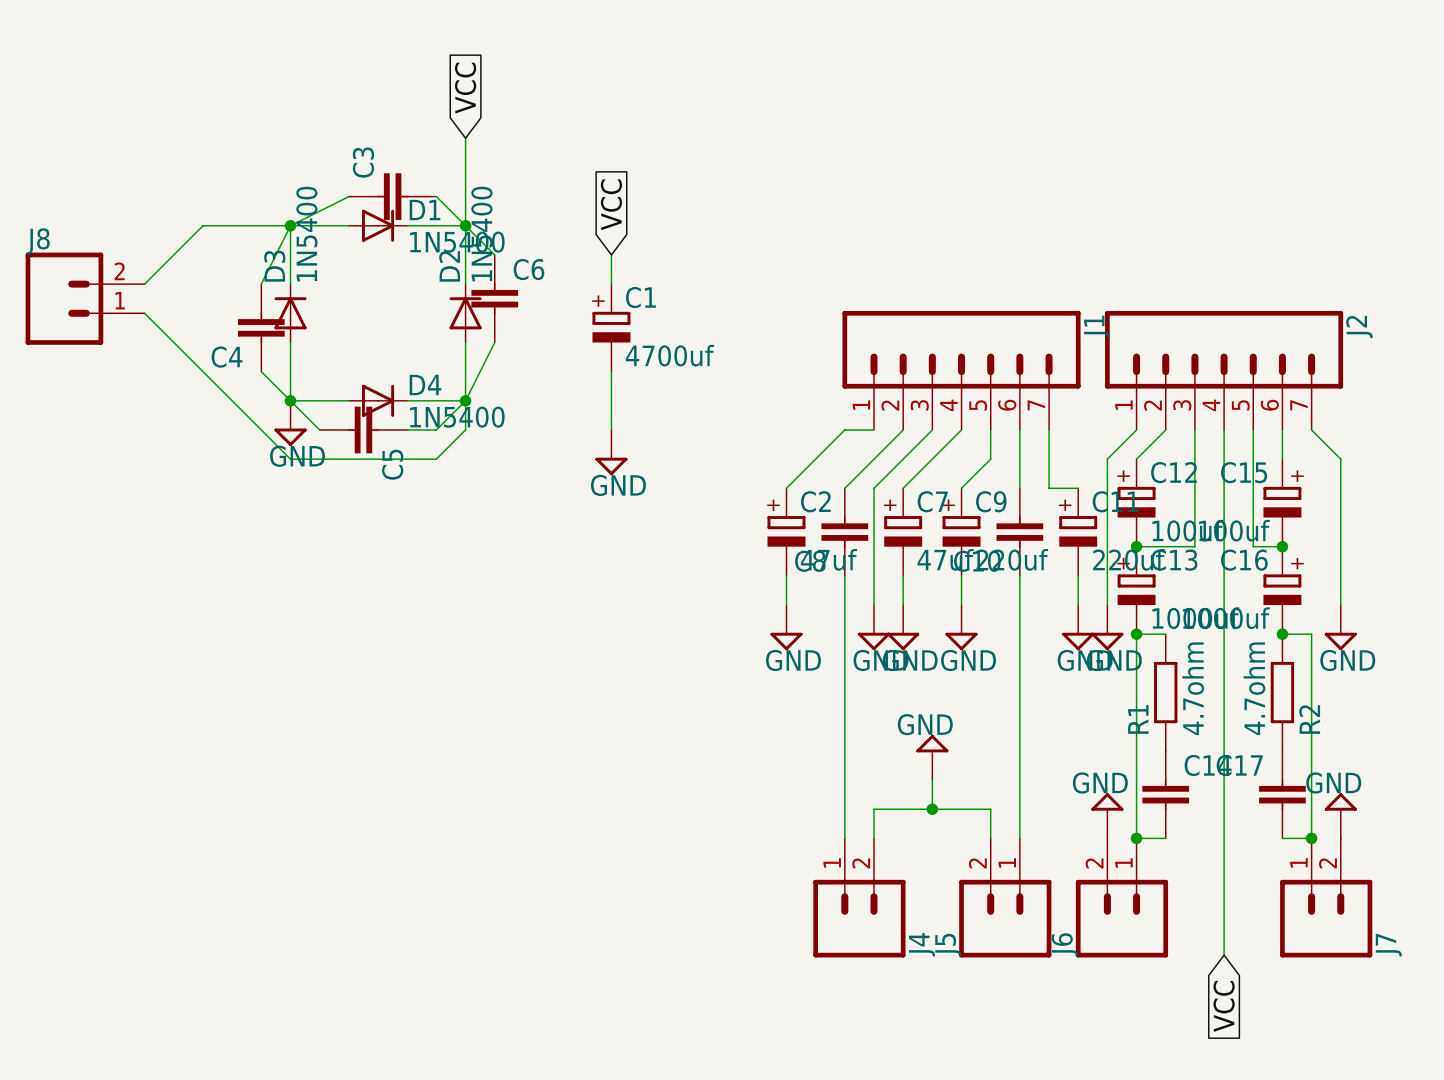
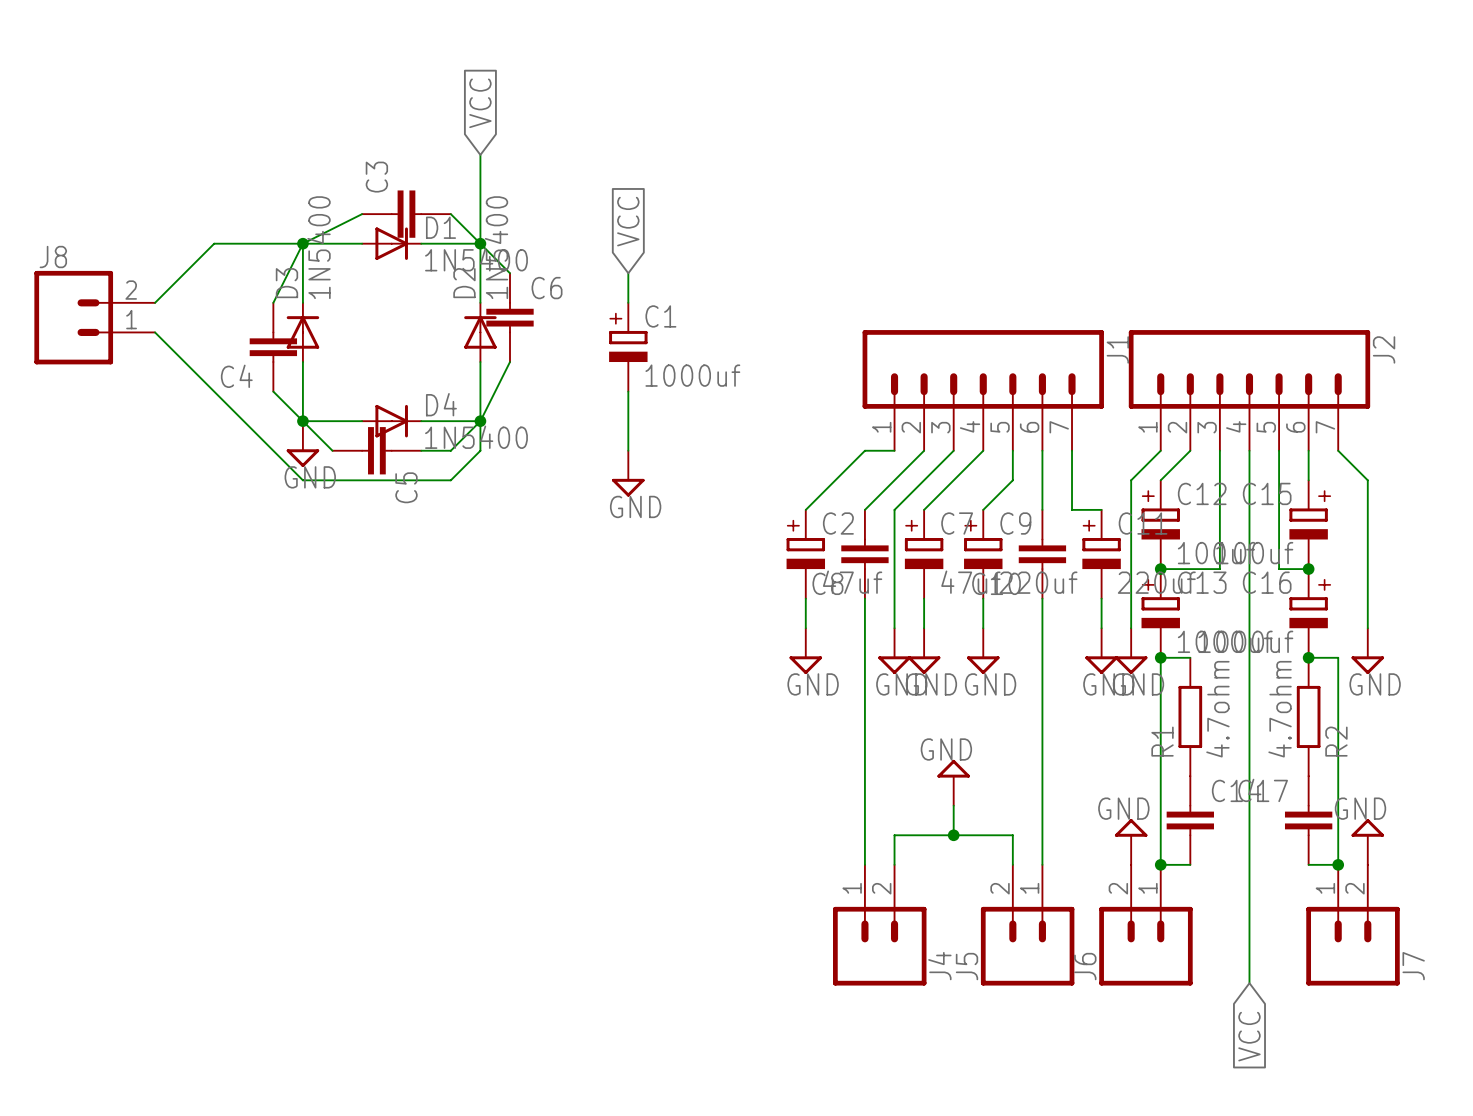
C1 value: 4700uf (669, 355) -> 1000uf (692, 375)

